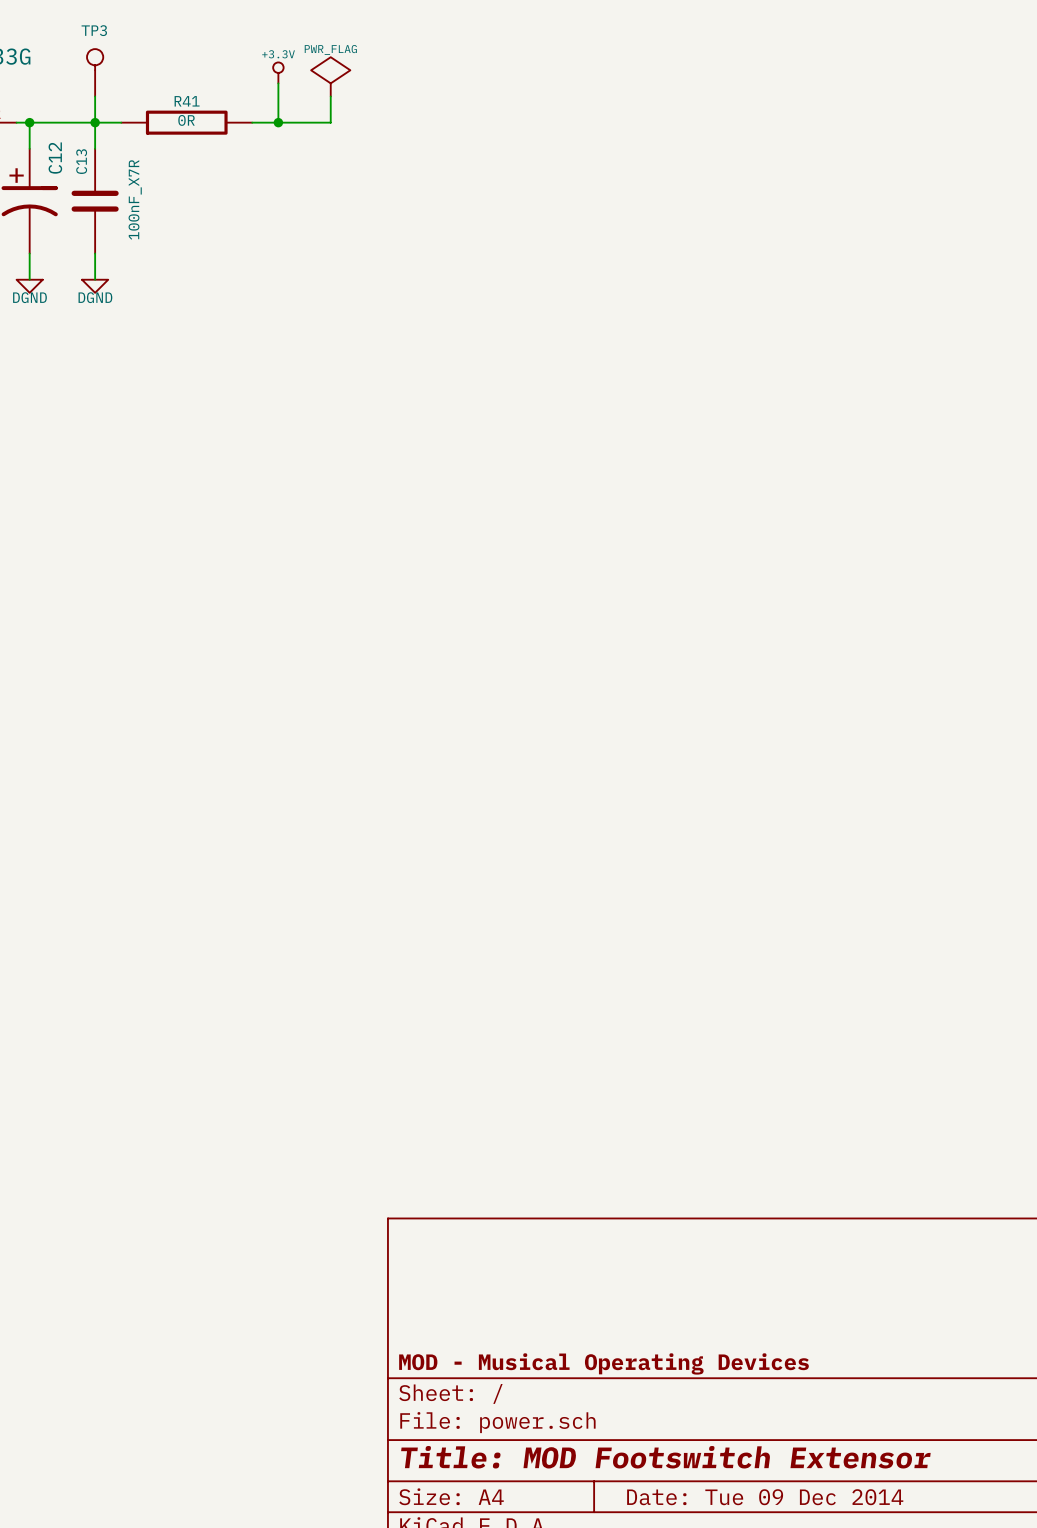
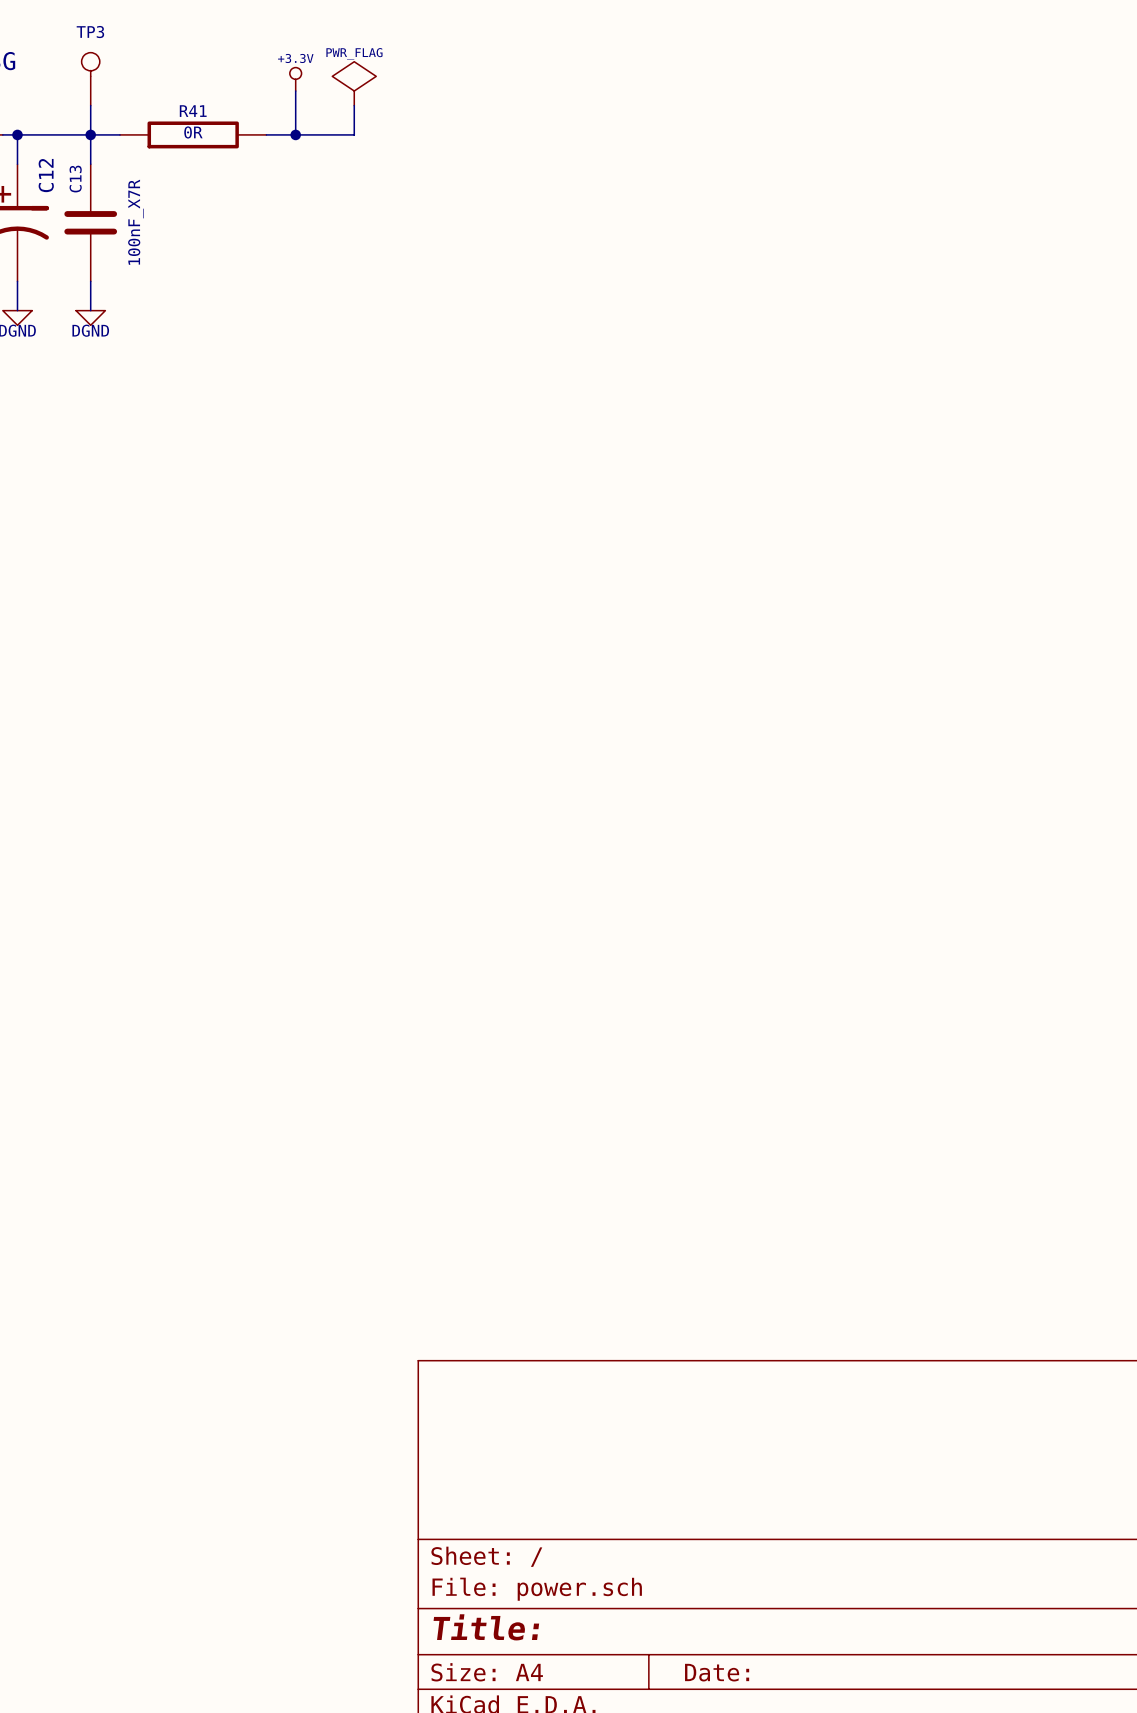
title block: MOD - Musical Operating Devices (603, 1363) -> none
title block: Title: MOD Footswitch Extensor (665, 1457) -> Title: (486, 1627)
title block: Date: Tue 09 Dec 2014 (765, 1497) -> Date: (717, 1672)

